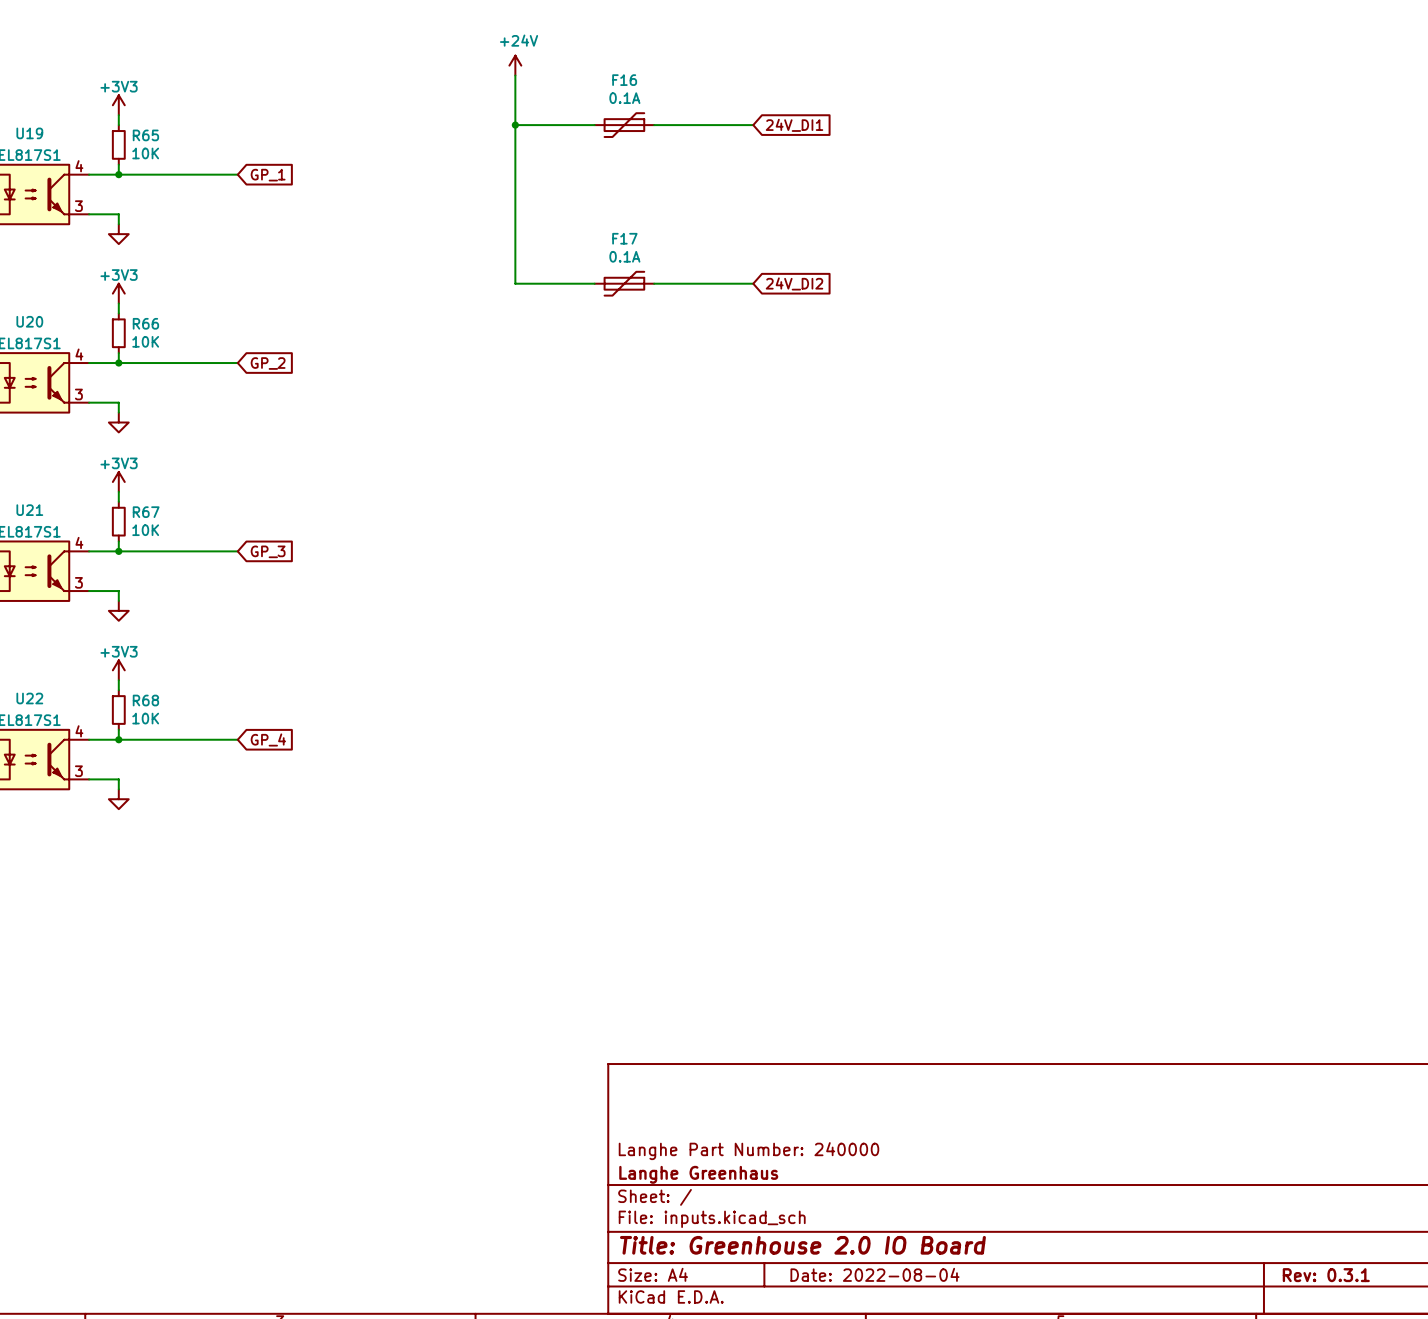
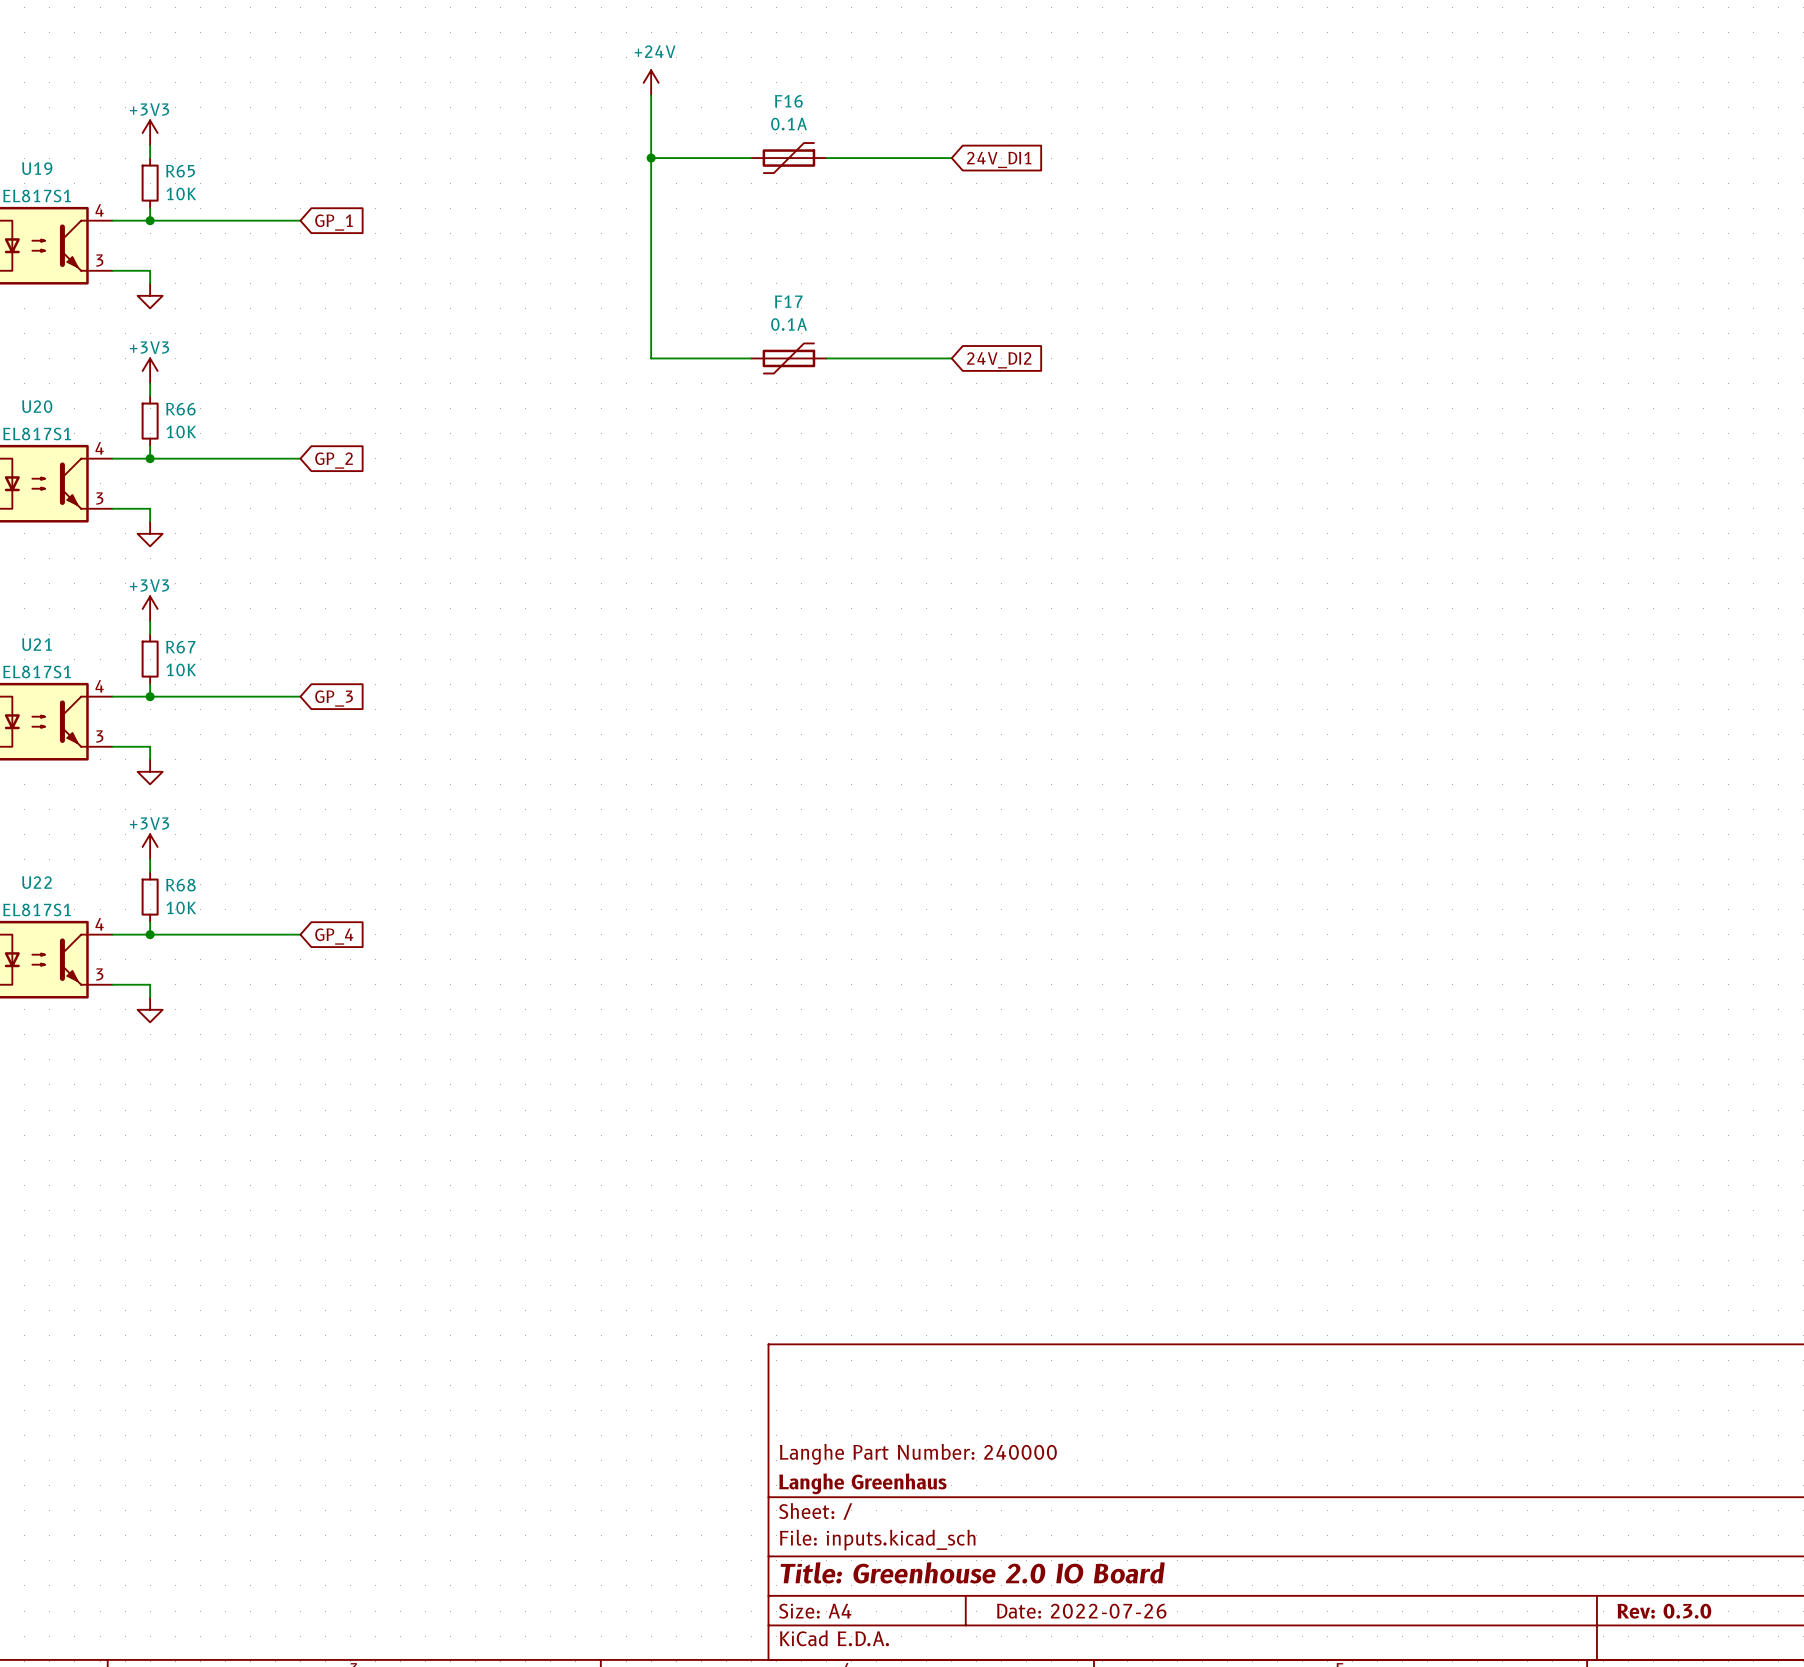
title block: Date: 2022-08-04 (875, 1274) -> Date: 2022-07-26 (1081, 1611)
title block: Rev: 0.3.1 (1326, 1275) -> Rev: 0.3.0 (1664, 1611)

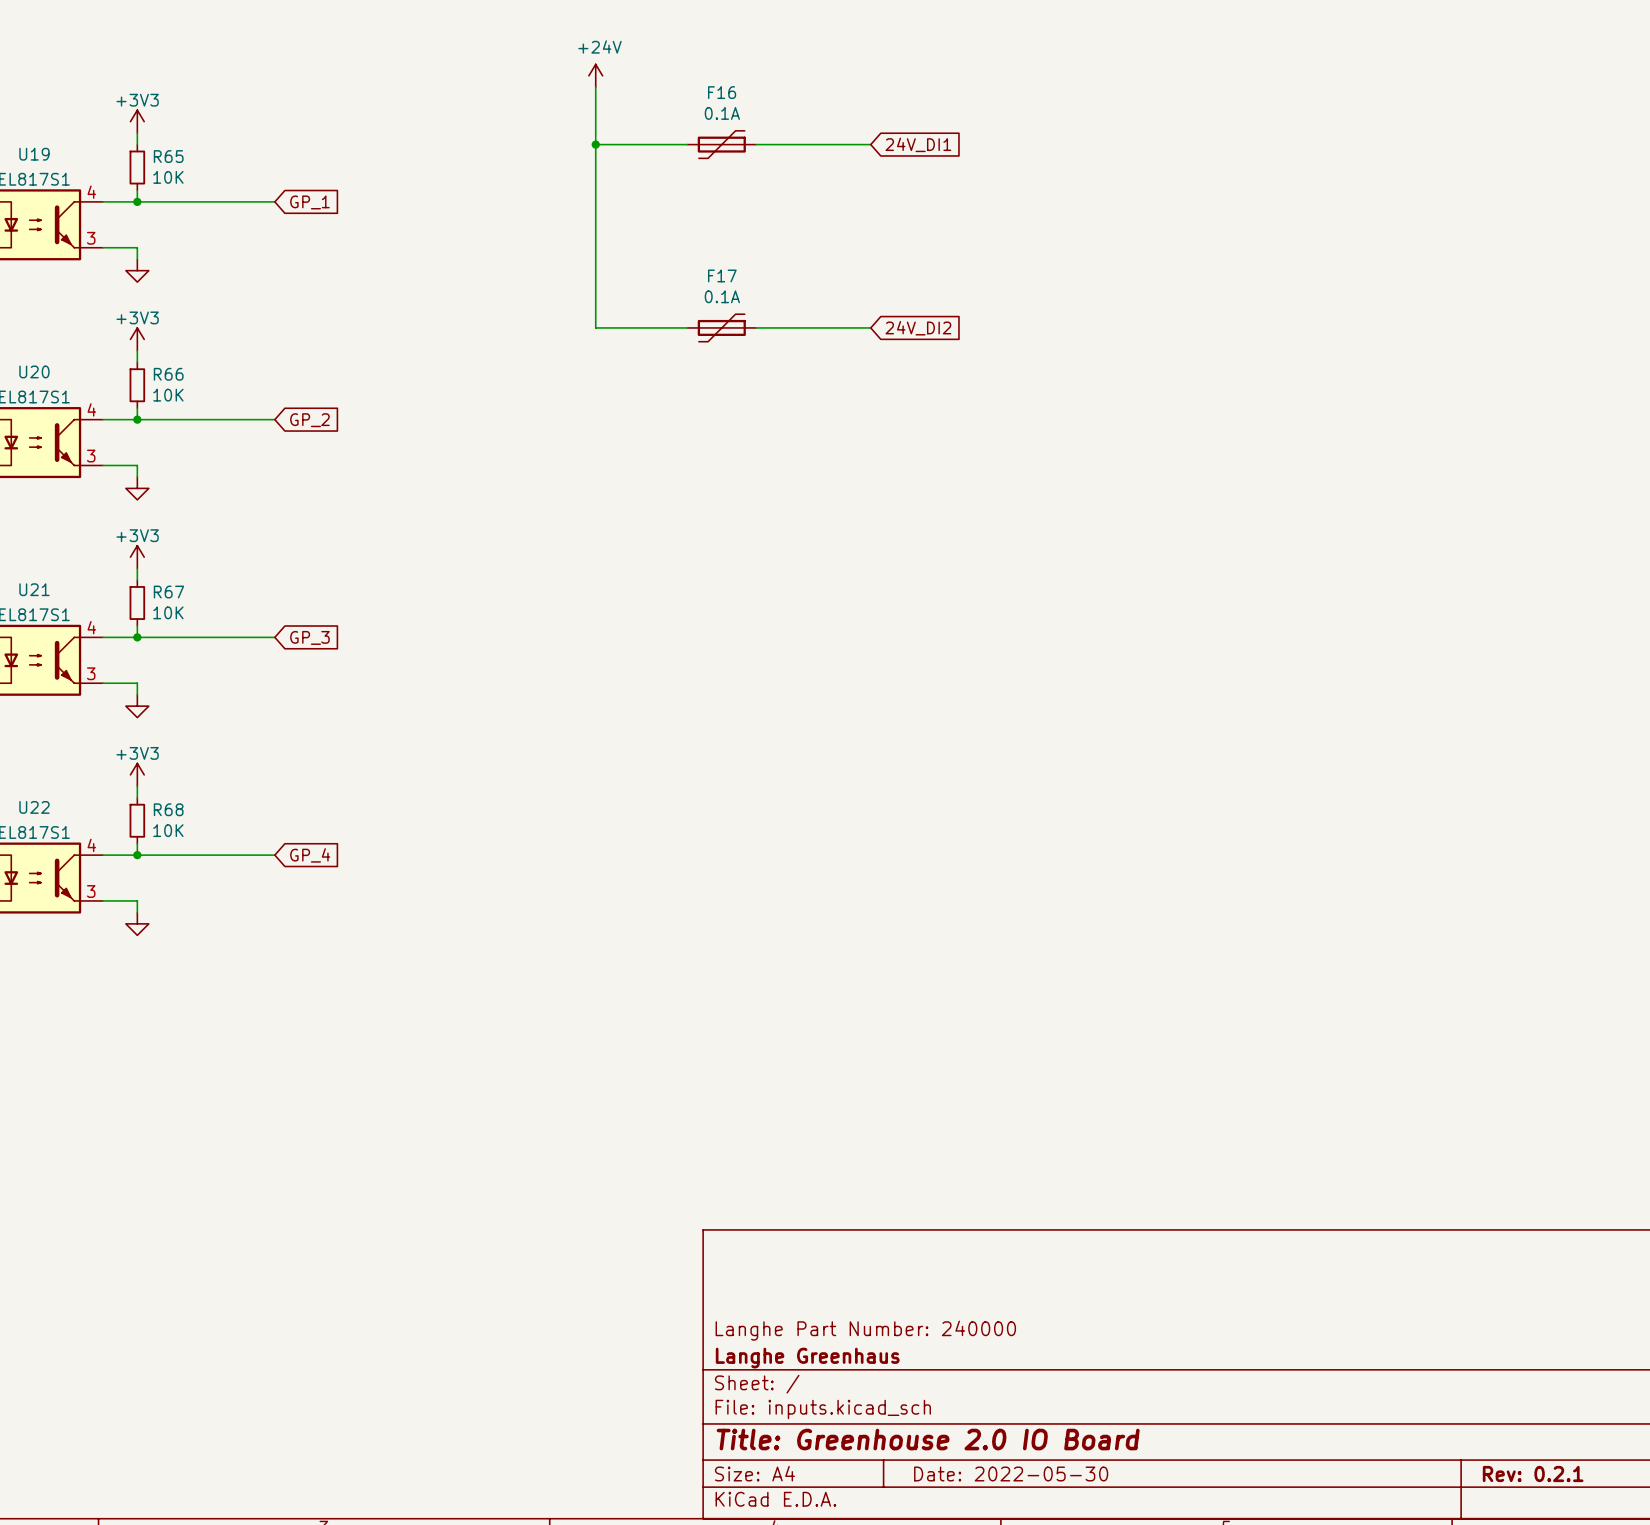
title block: Date: 2022-07-26 (1081, 1611) -> Date: 2022-05-30 (1011, 1474)
title block: Rev: 0.3.0 (1664, 1611) -> Rev: 0.2.1 (1533, 1474)

